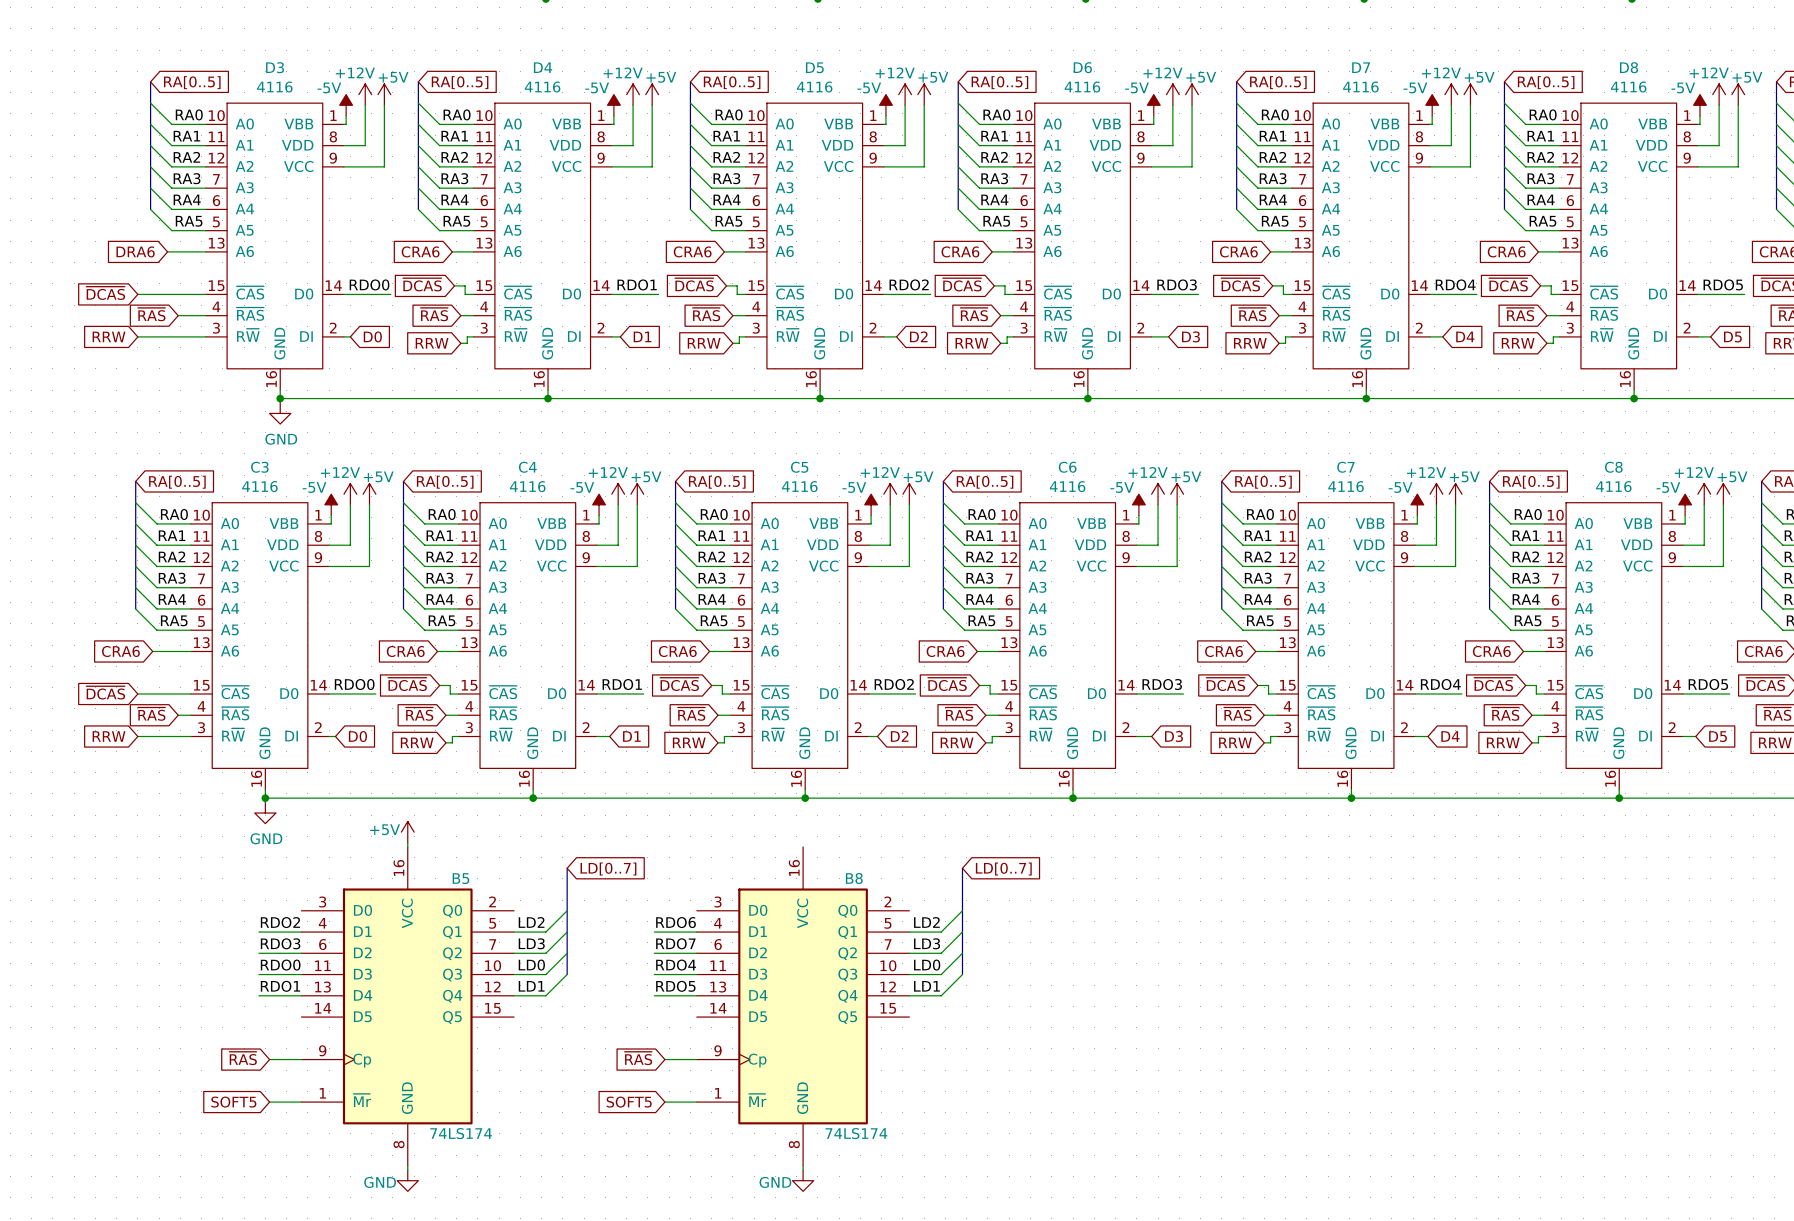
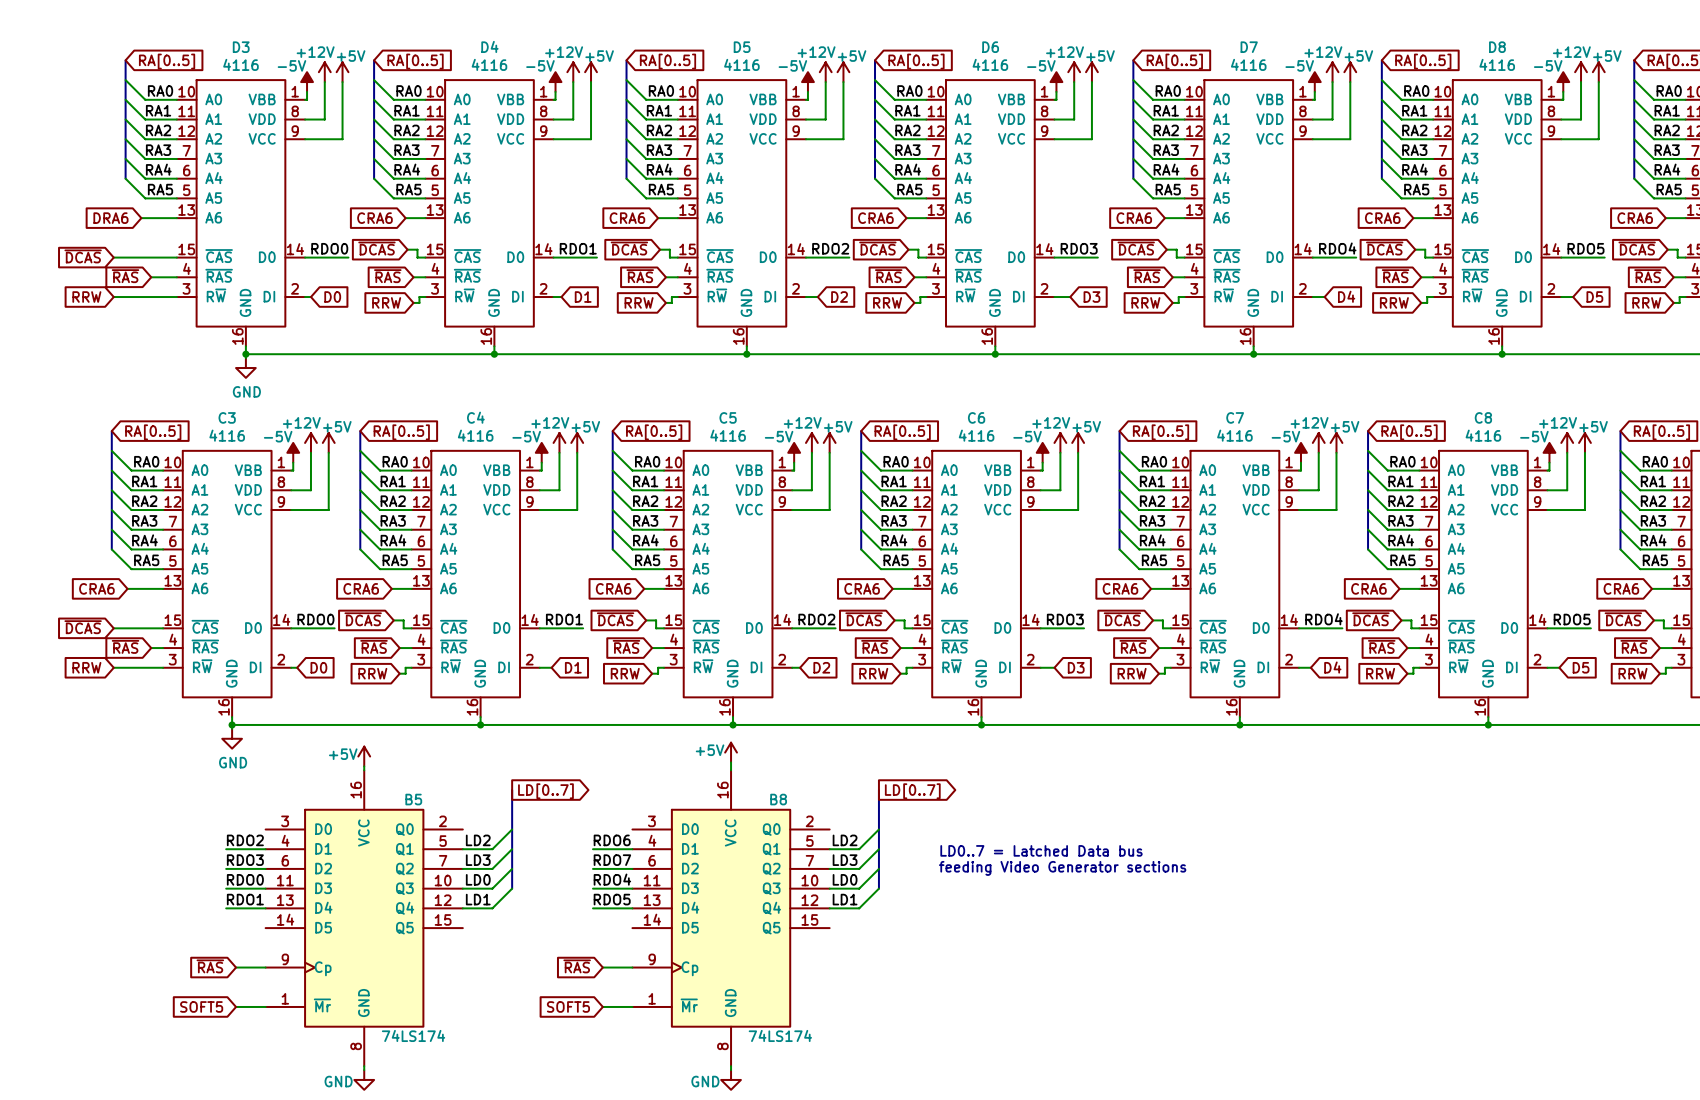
power symbol: none -> +5V (731, 752)
wire: none -> (731, 762) (731, 770)
global label shape: input (608, 869) -> output (545, 791)
global label shape: input (1003, 869) -> output (912, 791)
text: none -> LD0..7 = Latched Data bus (1041, 850)
text: none -> feeding Video Generator sections (1062, 868)

